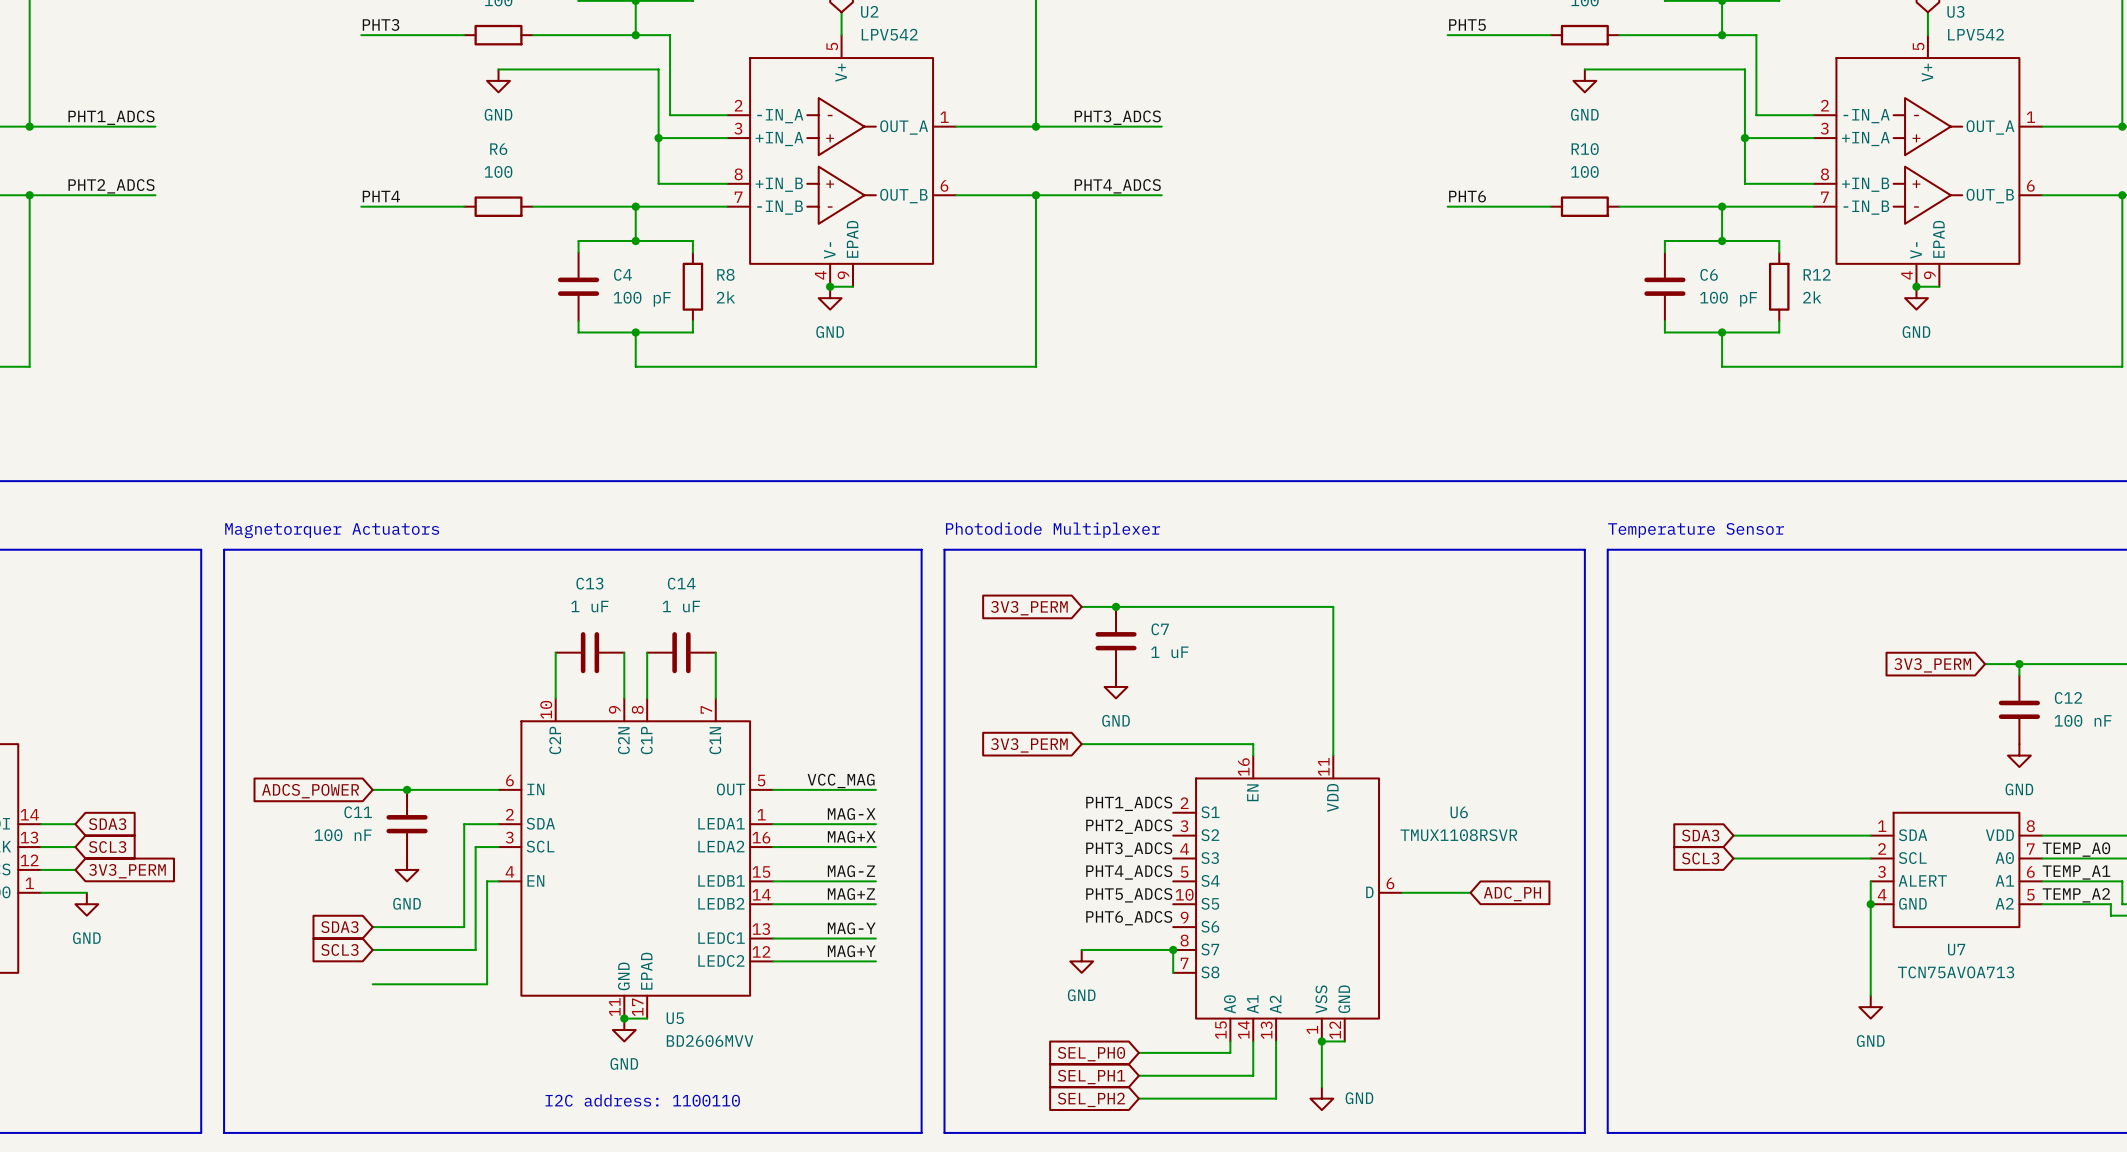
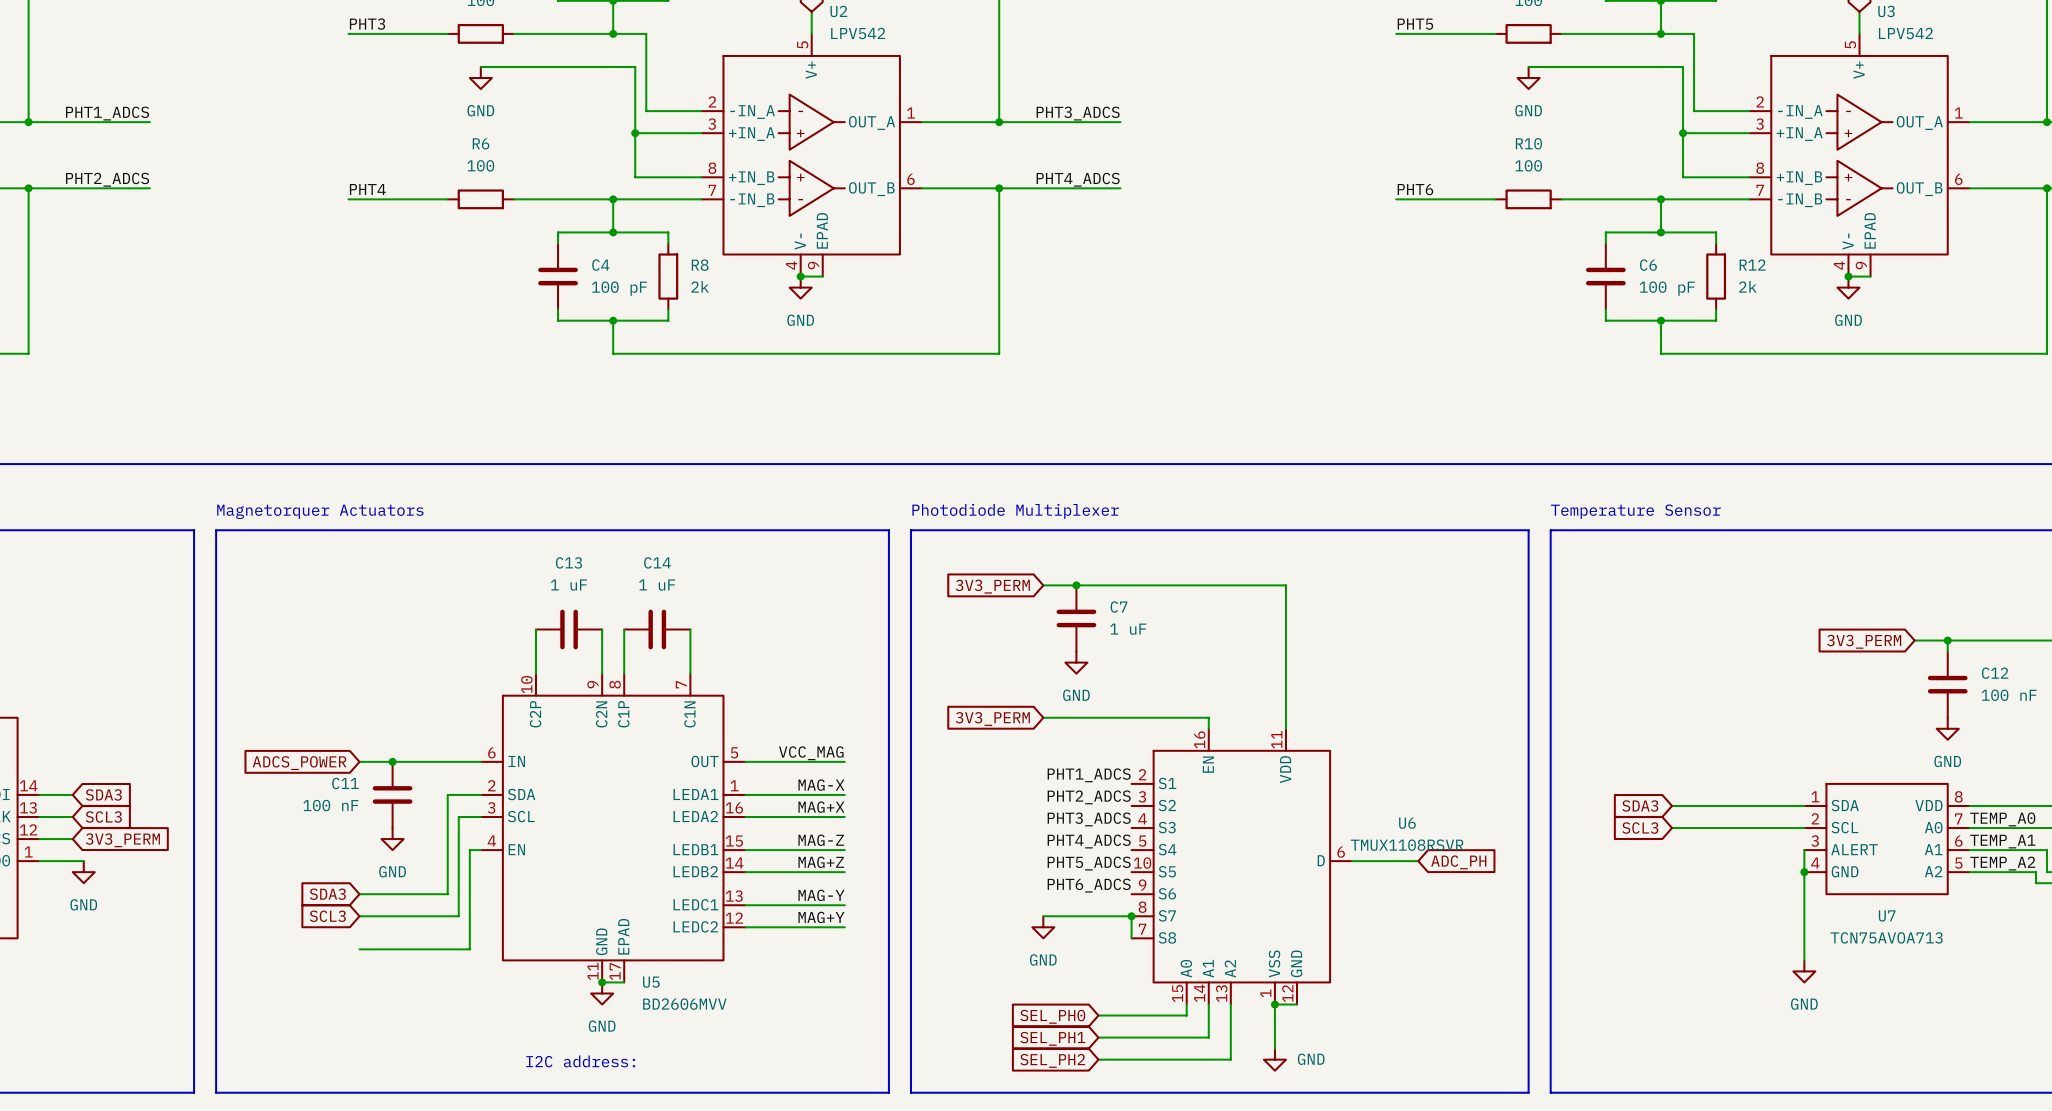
U6 name position: U6 (1459, 812) -> U6 (1407, 823)
U6 value position: TMUX1108RSVR (1458, 835) -> TMUX1108RSVR (1407, 845)
text: I2C address: 1100110 (642, 1100) -> I2C address: (580, 1061)

